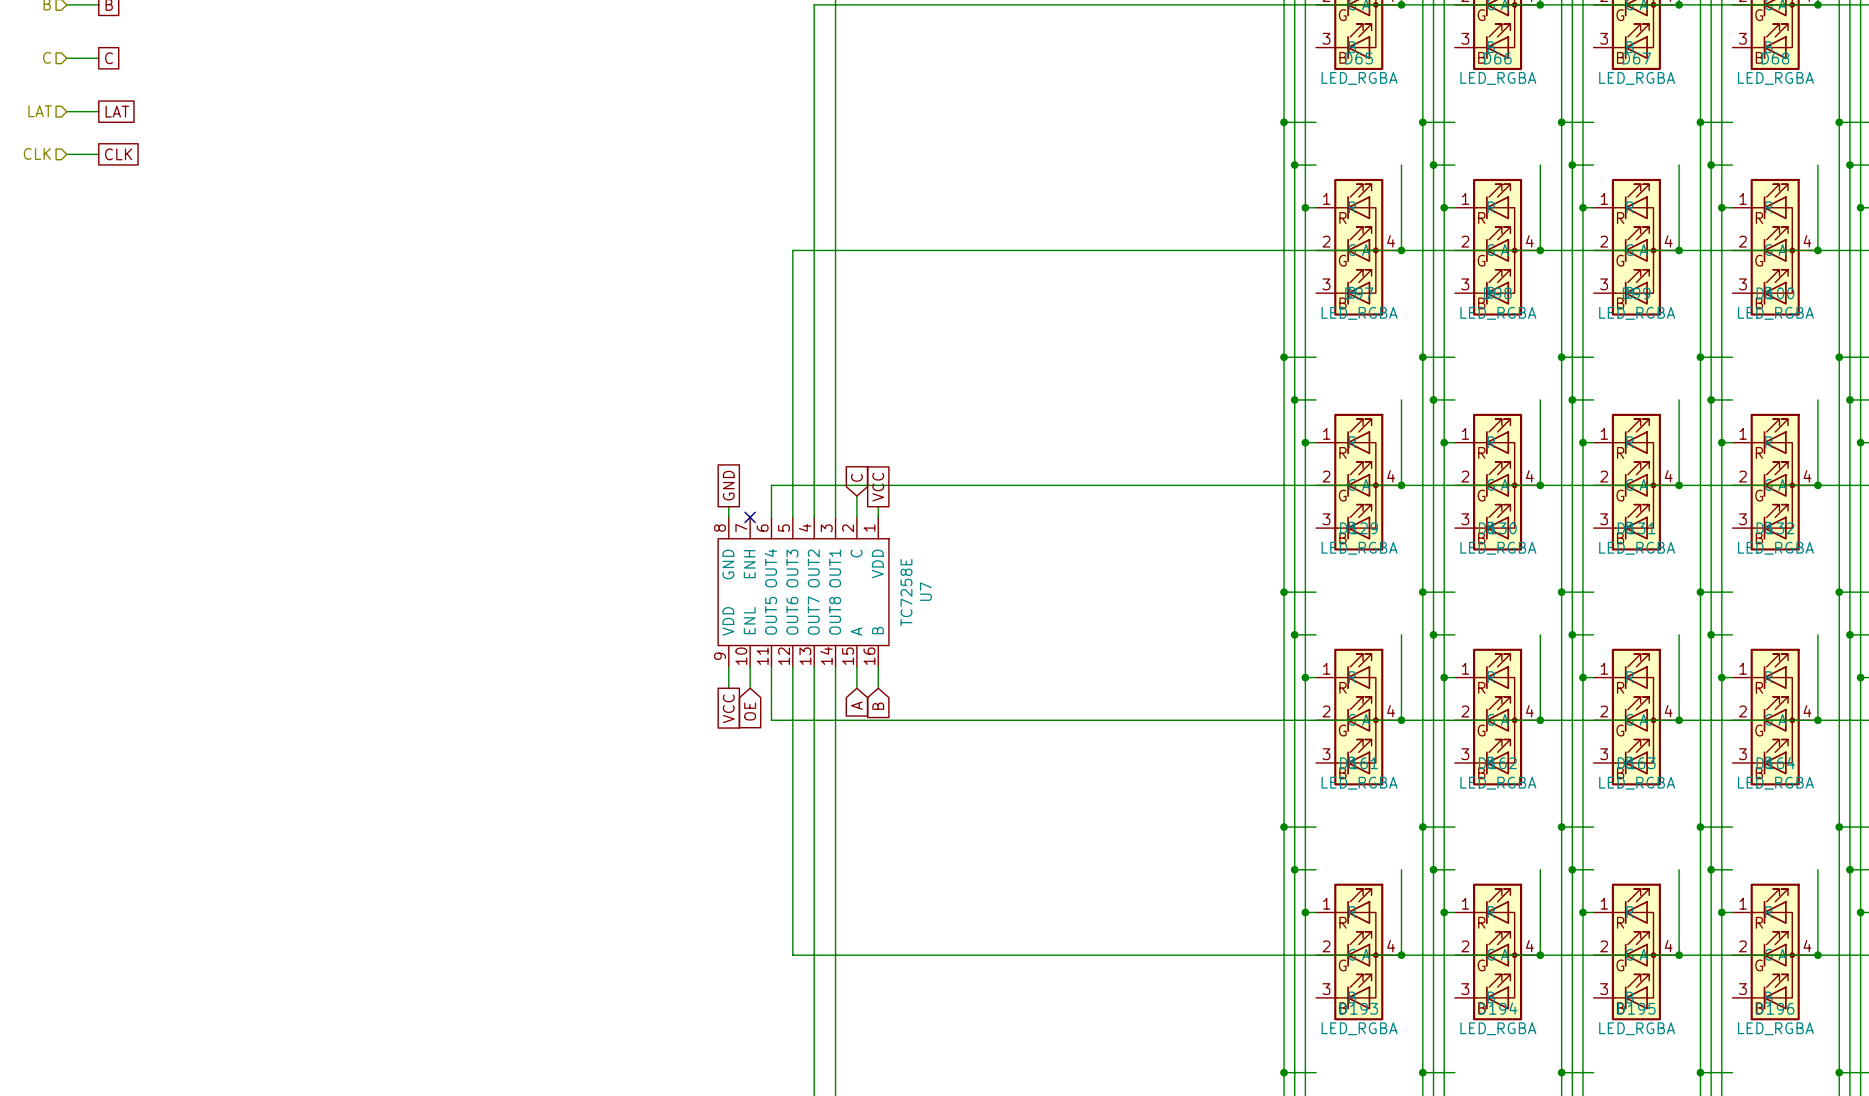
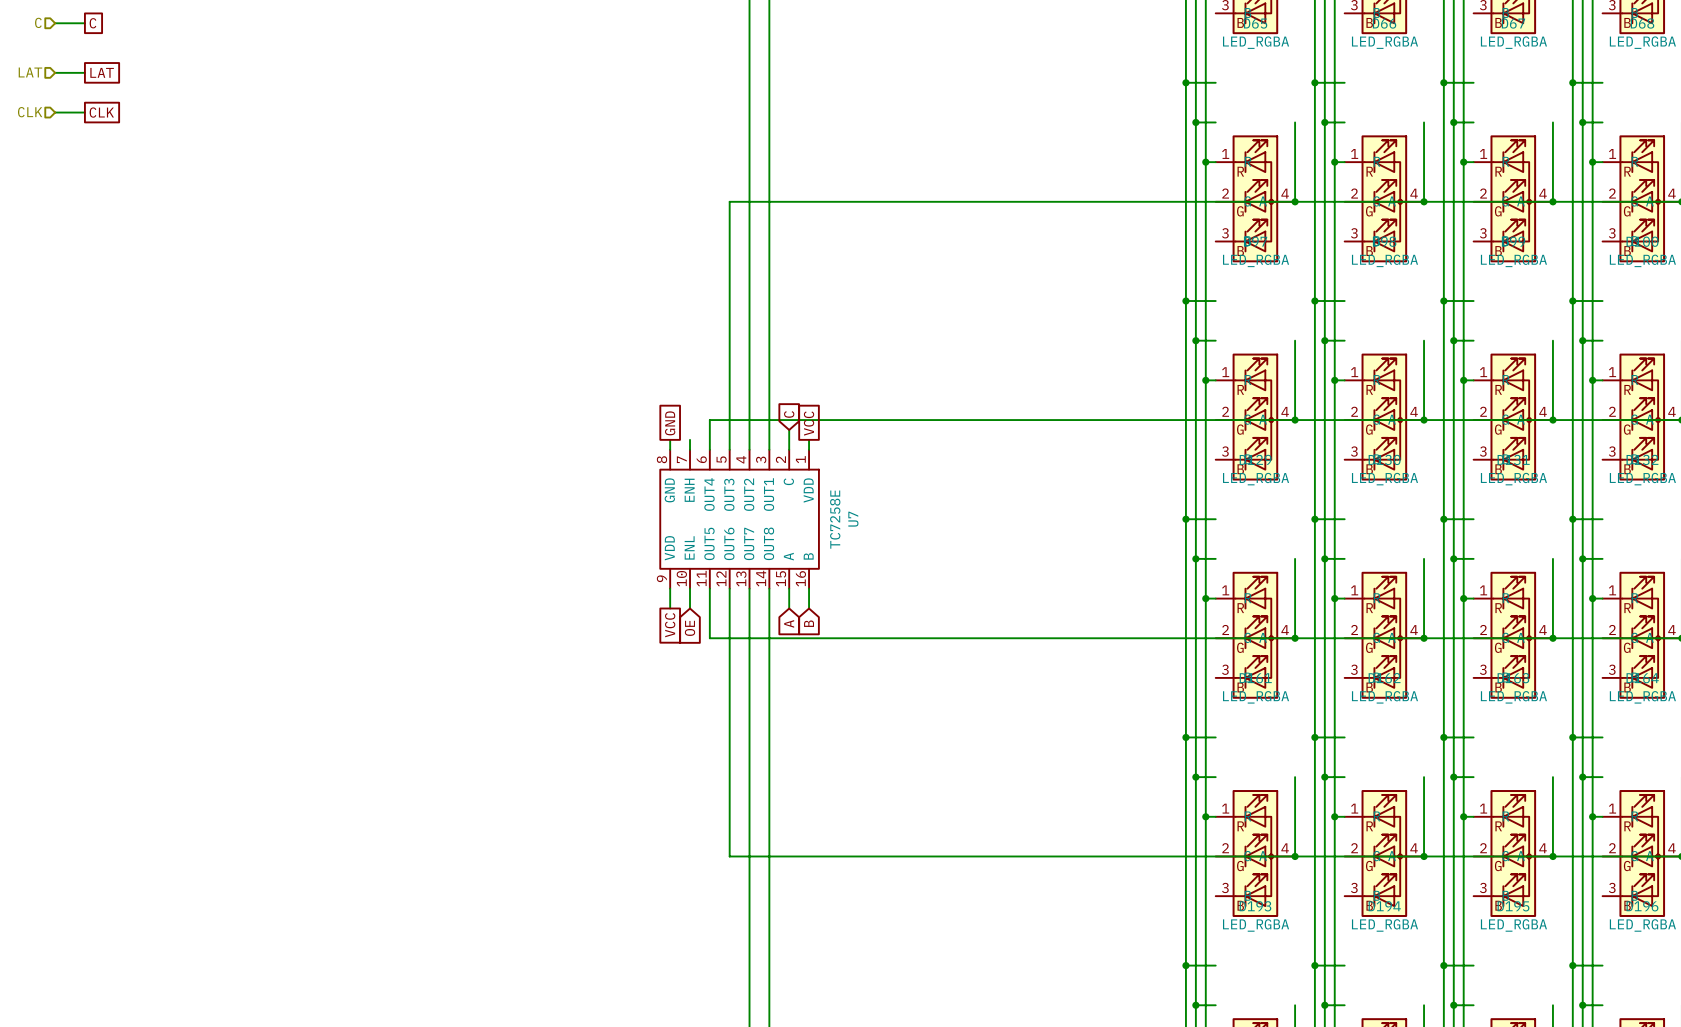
wire: none -> (690, 439) (690, 449)
no-connect mark: (750, 517) -> none

